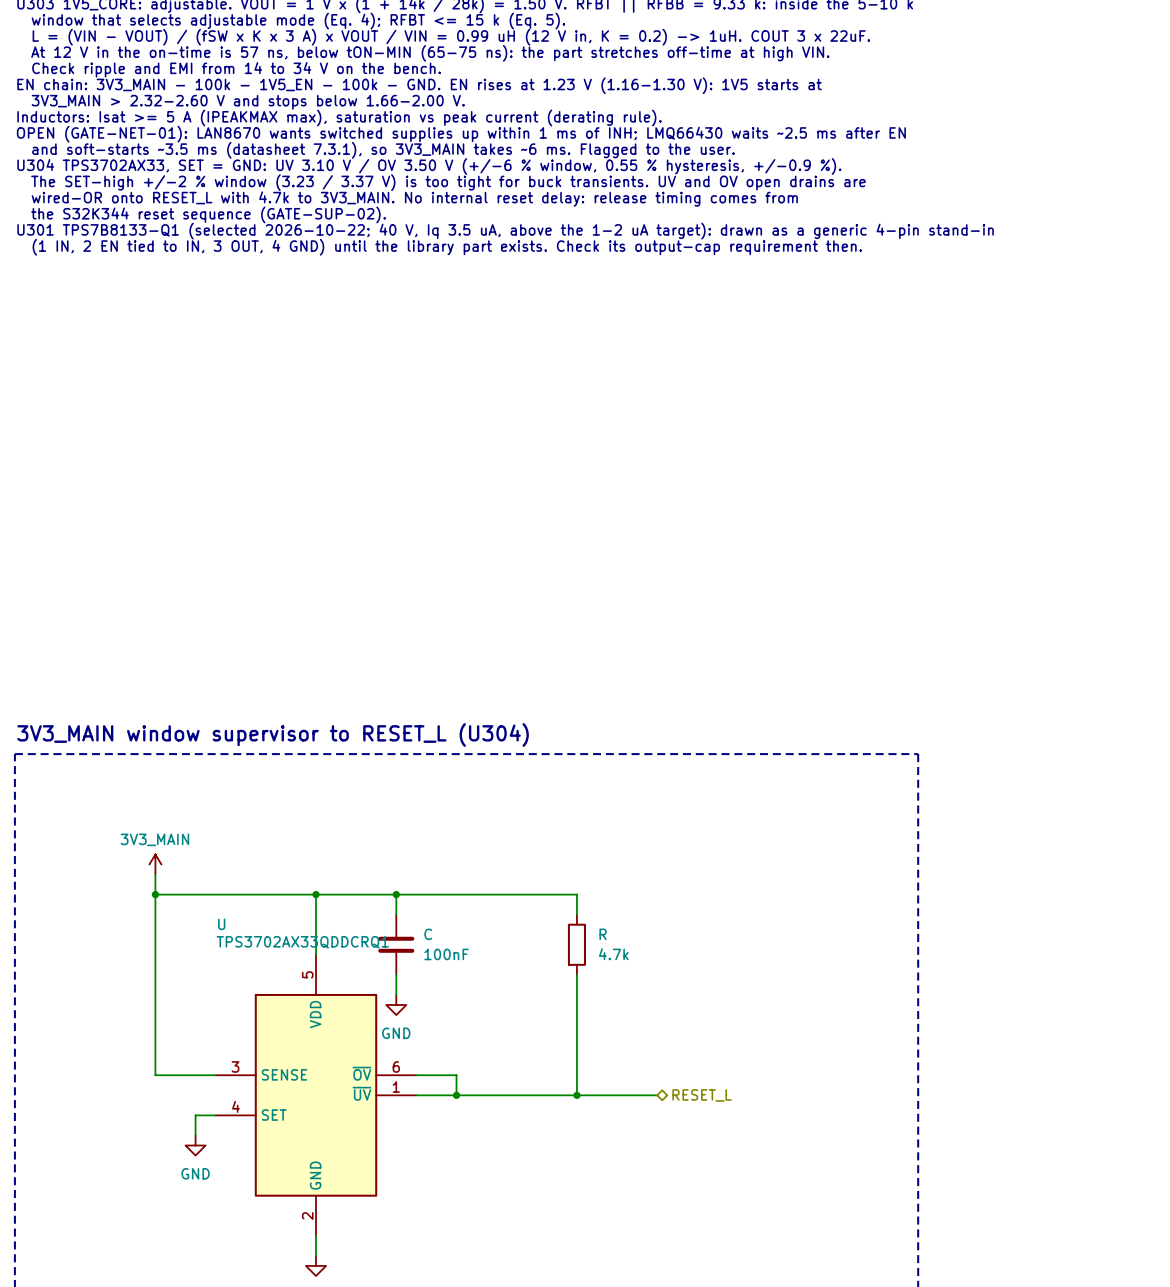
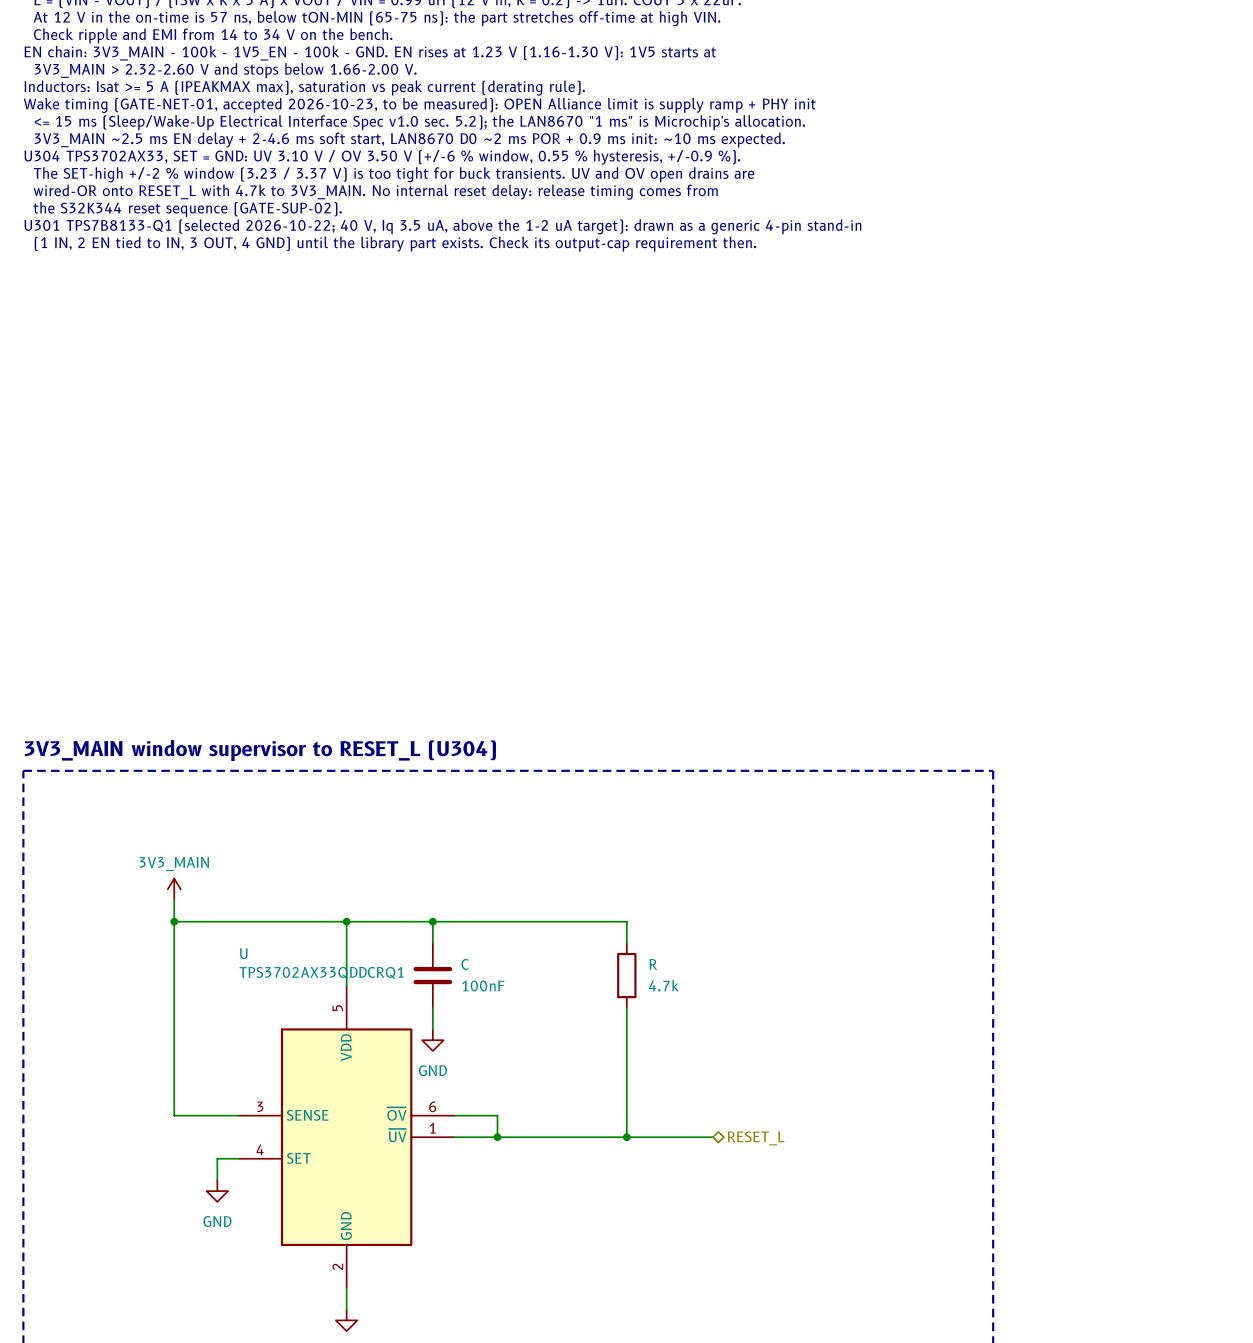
text: OPEN (GATE-NET-01): LAN8670 wants switched supplies up within 1 ms of INH; LMQ66430 waits ~2.5 ms after EN (461, 134) -> Wake timing (GATE-NET-01, accepted 2026-10-23, to be measured): OPEN Alliance limit is supply ramp + PHY init (419, 105)
text: and soft-starts ~3.5 ms (datasheet 7.3.1), so 3V3_MAIN takes ~6 ms. Flagged to the user. (383, 150) -> <= 15 ms (Sleep/Wake-Up Electrical Interface Spec v1.0 sec. 5.2); the LAN8670 "1 ms" is Microchip's allocation. (419, 122)
text: U304 TPS3702AX33, SET = GND: UV 3.10 V / OV 3.50 V (+/-6 % window, 0.55 % hysteresis, +/-0.9 %). (429, 166) -> 3V3_MAIN ~2.5 ms EN delay + 2-4.6 ms soft start, LAN8670 D0 ~2 ms POR + 0.9 ms init: ~10 ms expected. (409, 140)
text: The SET-high +/-2 % window (3.23 / 3.37 V) is too tight for buck transients. UV and OV open drains are (448, 182) -> U304 TPS3702AX33, SET = GND: UV 3.10 V / OV 3.50 V (+/-6 % window, 0.55 % hysteresis, +/-0.9 %). (382, 157)
text: wired-OR onto RESET_L with 4.7k to 3V3_MAIN. No internal reset delay: release timing comes from (414, 199) -> The SET-high +/-2 % window (3.23 / 3.37 V) is too tight for buck transients. UV and OV open drains are (394, 174)
text: the S32K344 reset sequence (GATE-SUP-02). (208, 214) -> wired-OR onto RESET_L with 4.7k to 3V3_MAIN. No internal reset delay: release timing comes from (375, 192)
text: U301 TPS7B8133-Q1 (selected 2026-10-22; 40 V, Iq 3.5 uA, above the 1-2 uA target): drawn as a generic 4-pin stand-in (505, 231) -> the S32K344 reset sequence (GATE-SUP-02). (187, 209)
text: (1 IN, 2 EN tied to IN, 3 OUT, 4 GND) until the library part exists. Check its output-cap requirement then. (447, 247) -> U301 TPS7B8133-Q1 (selected 2026-10-22; 40 V, Iq 3.5 uA, above the 1-2 uA target): drawn as a generic 4-pin stand-in (442, 226)
text: none -> (1 IN, 2 EN tied to IN, 3 OUT, 4 GND) until the library part exists. Check its output-cap requirement then. (395, 244)

